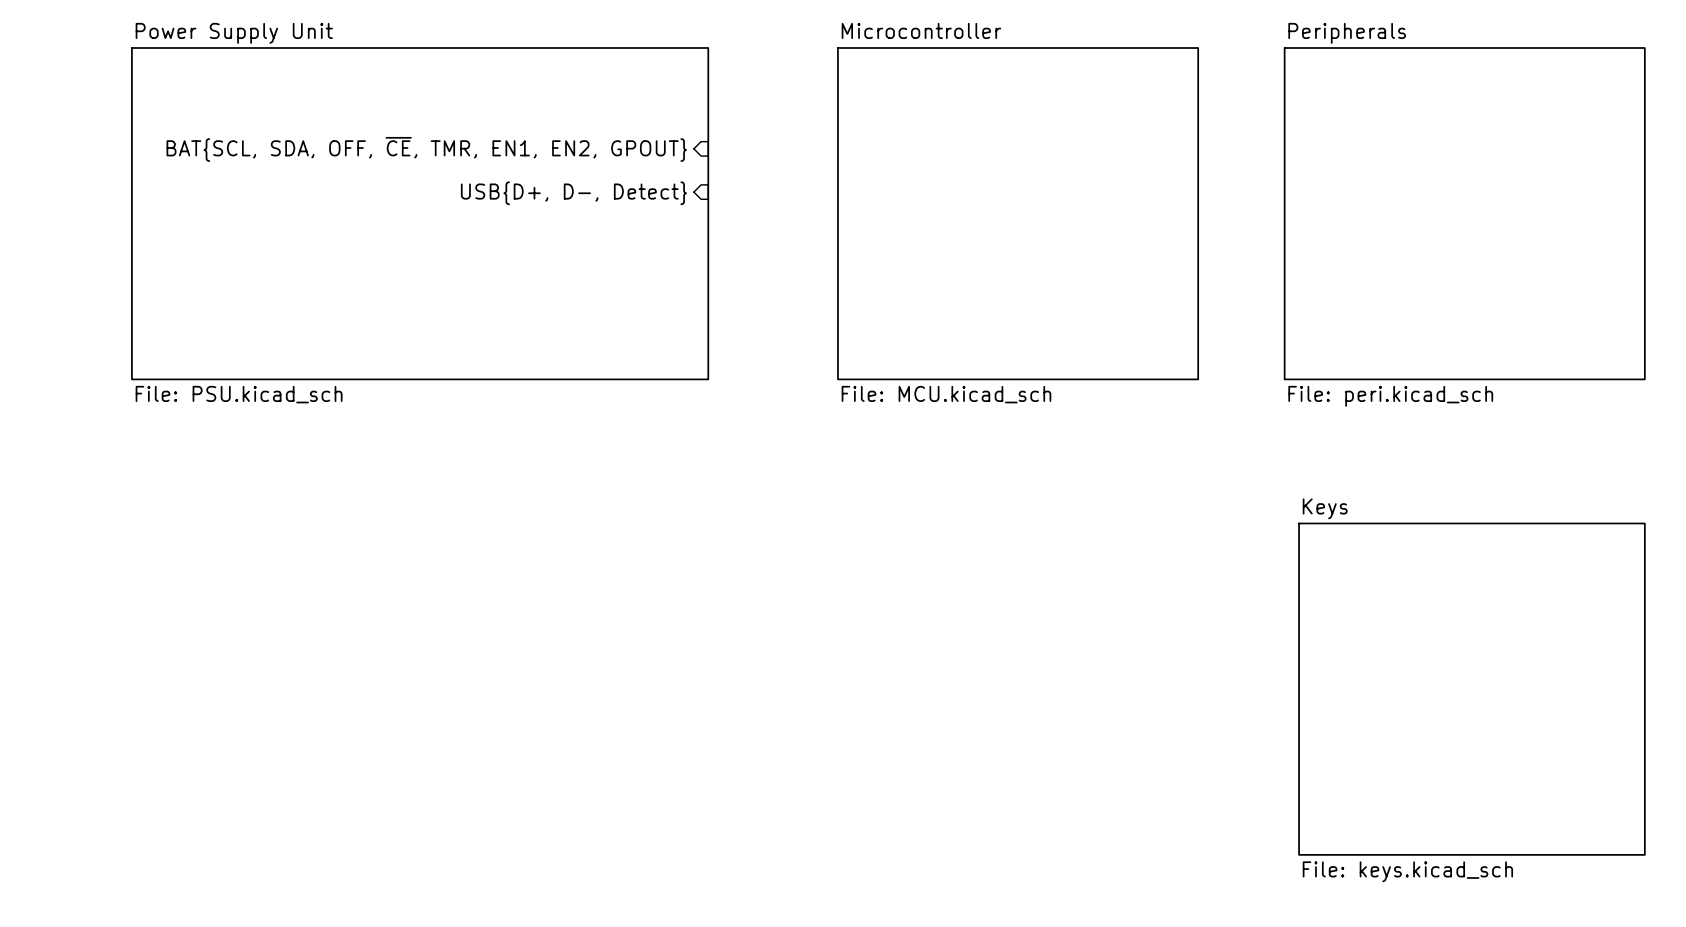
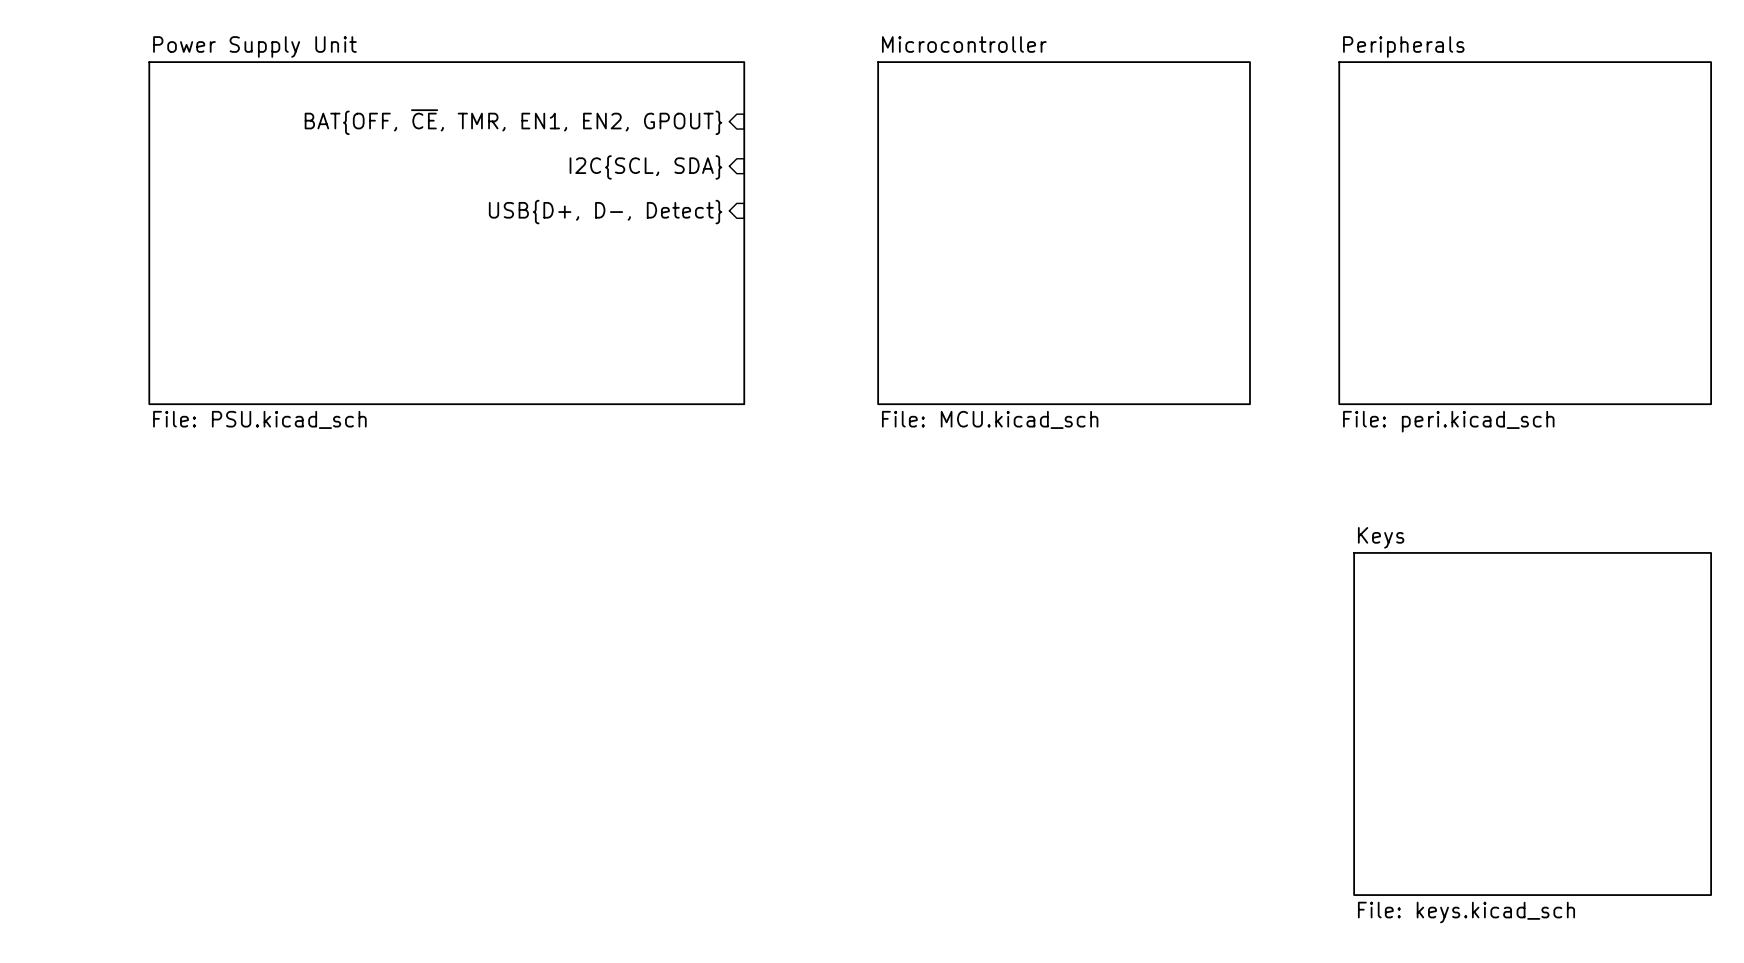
sheet pin: none -> BAT{OFF, ~{CE}, TMR, EN1, EN2, GPOUT} (513, 122)
sheet pin: BAT{SCL, SDA, OFF, ~{CE}, TMR, EN1, EN2, GPOUT} (426, 149) -> I2C{SCL, SDA} (645, 167)

